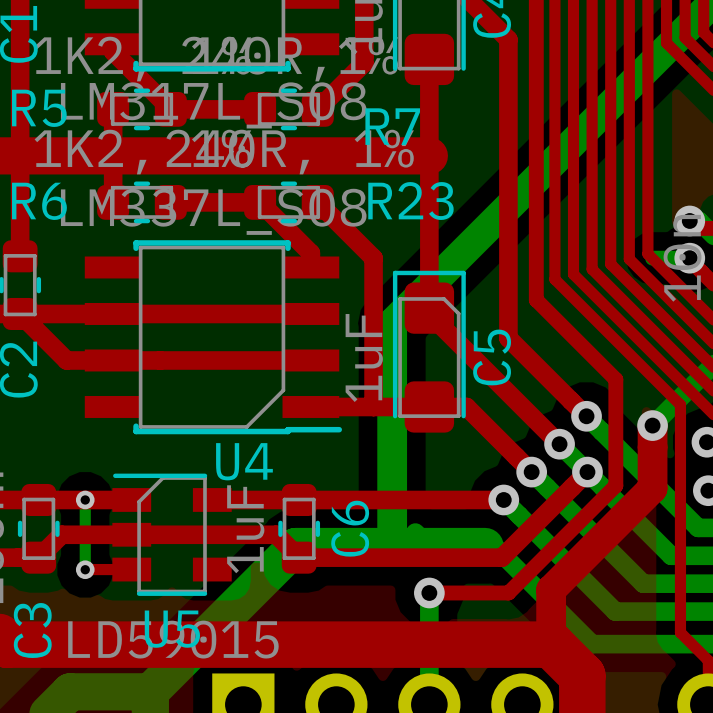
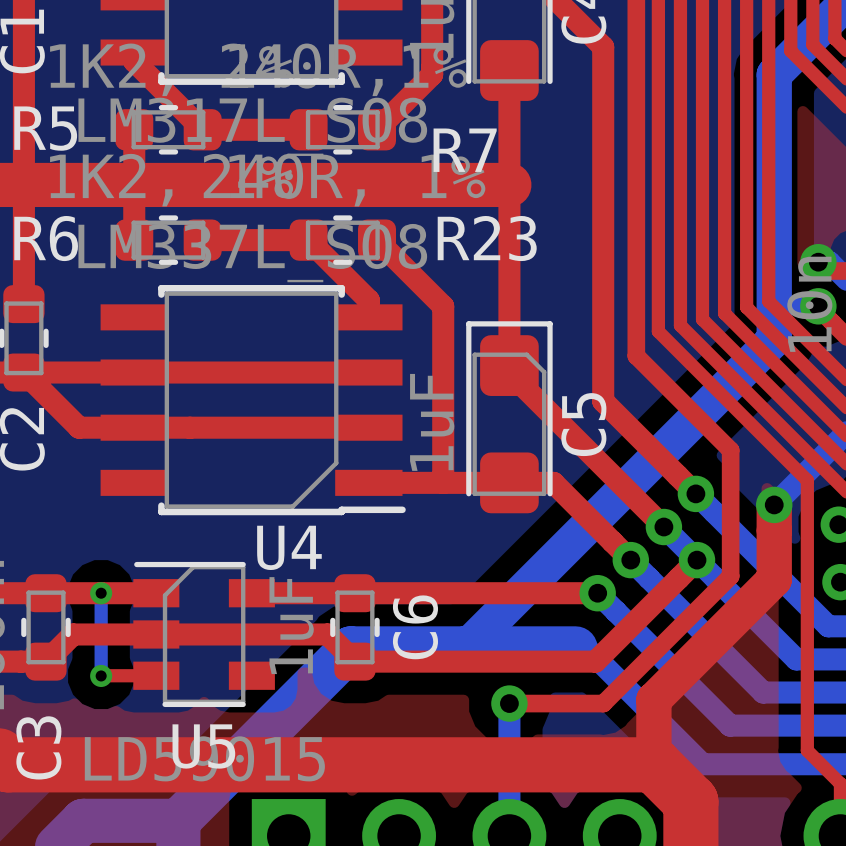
bottom track: (652, 62) (392, 323) (392, 546) -> (774, 74) (774, 339) (465, 648)

